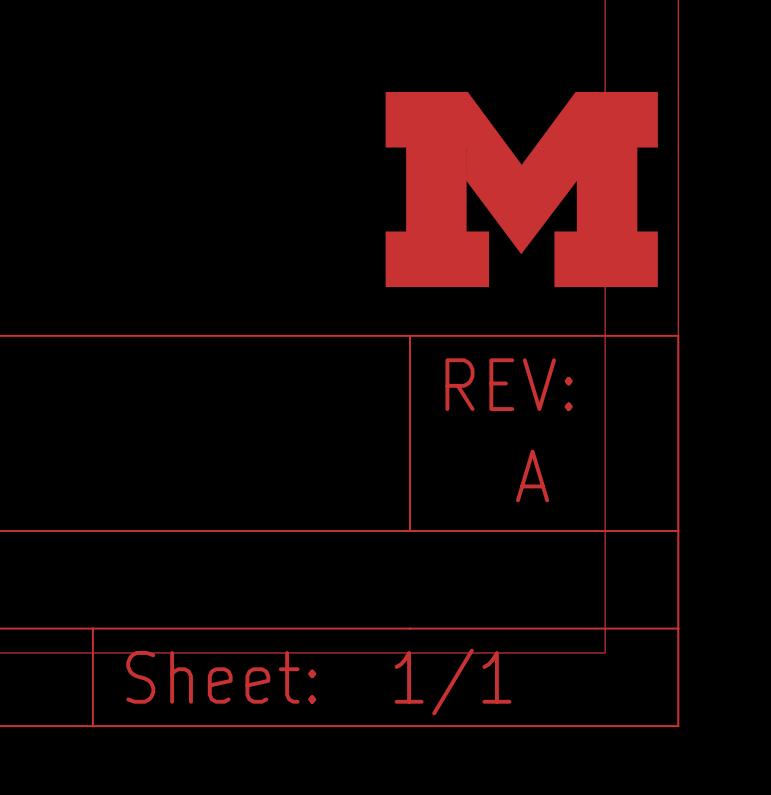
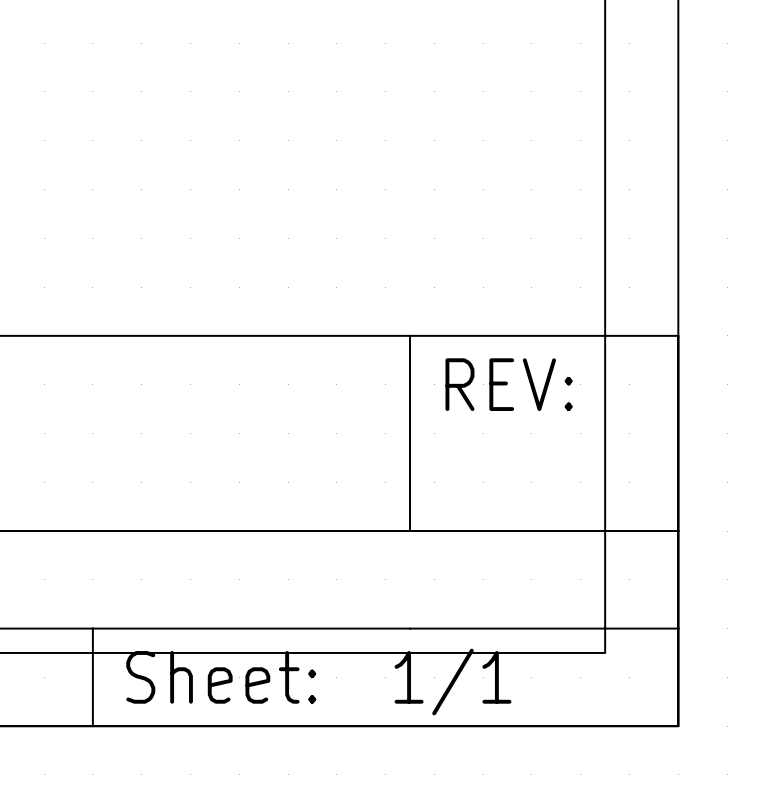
part: (521, 189) -> none
part text: A (532, 475) -> none

